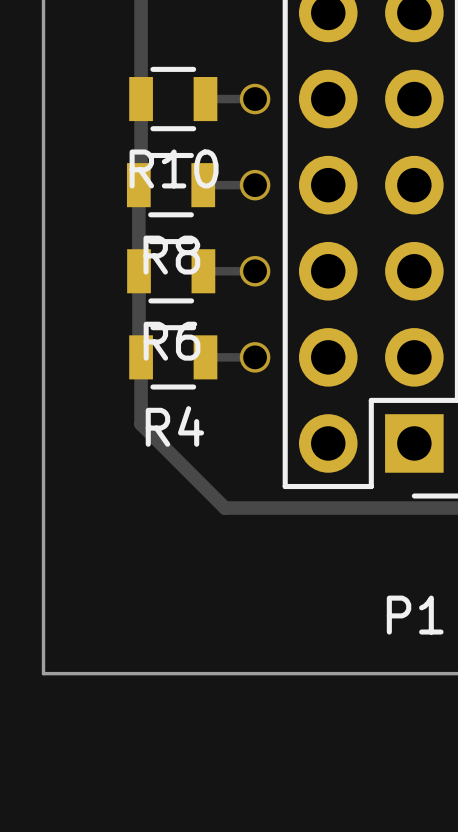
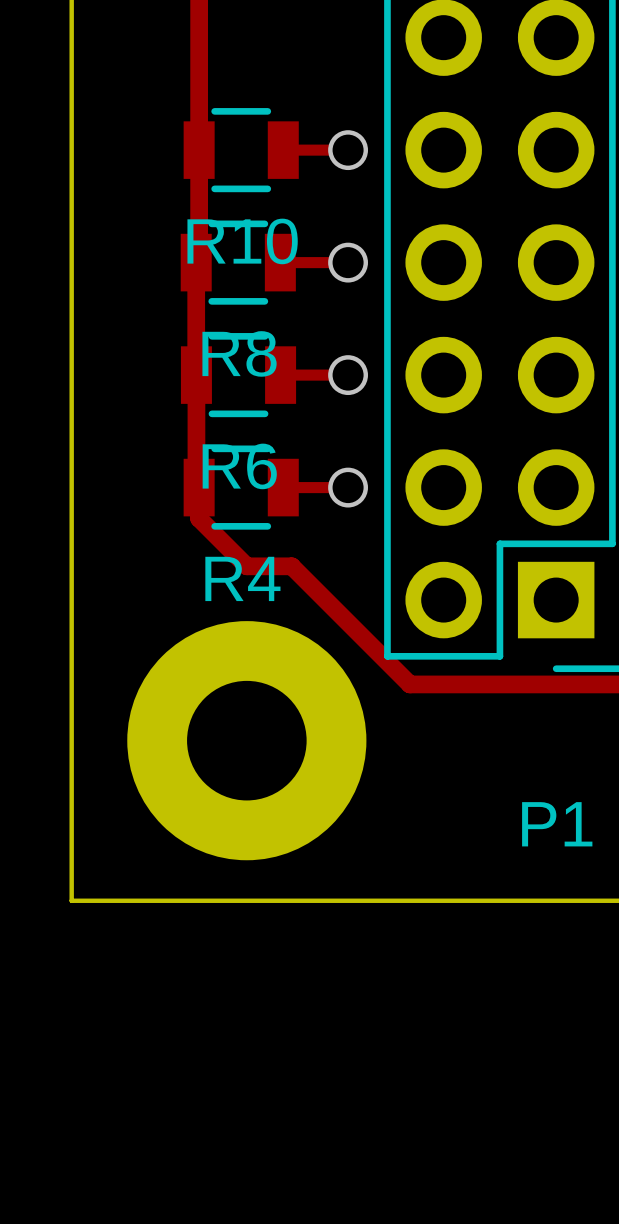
track: (141, 381) (141, 424) (224, 508) (302, 508) -> (199, 518) (246, 566) (291, 566) (409, 684)
part: none -> (246, 740)

